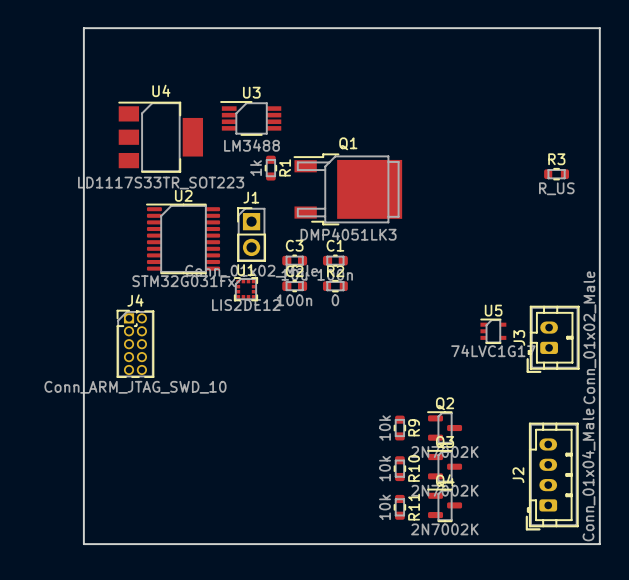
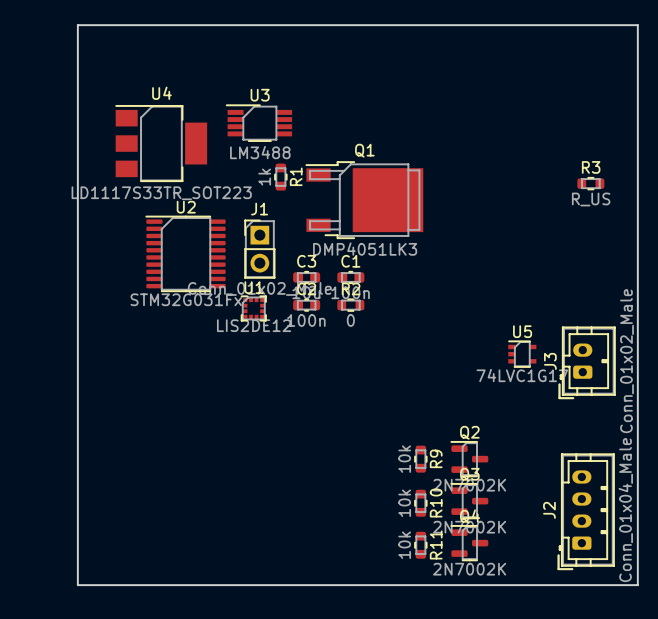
J4: Conn_ARM_JTAG_SWD_10 (135, 343) -> none

